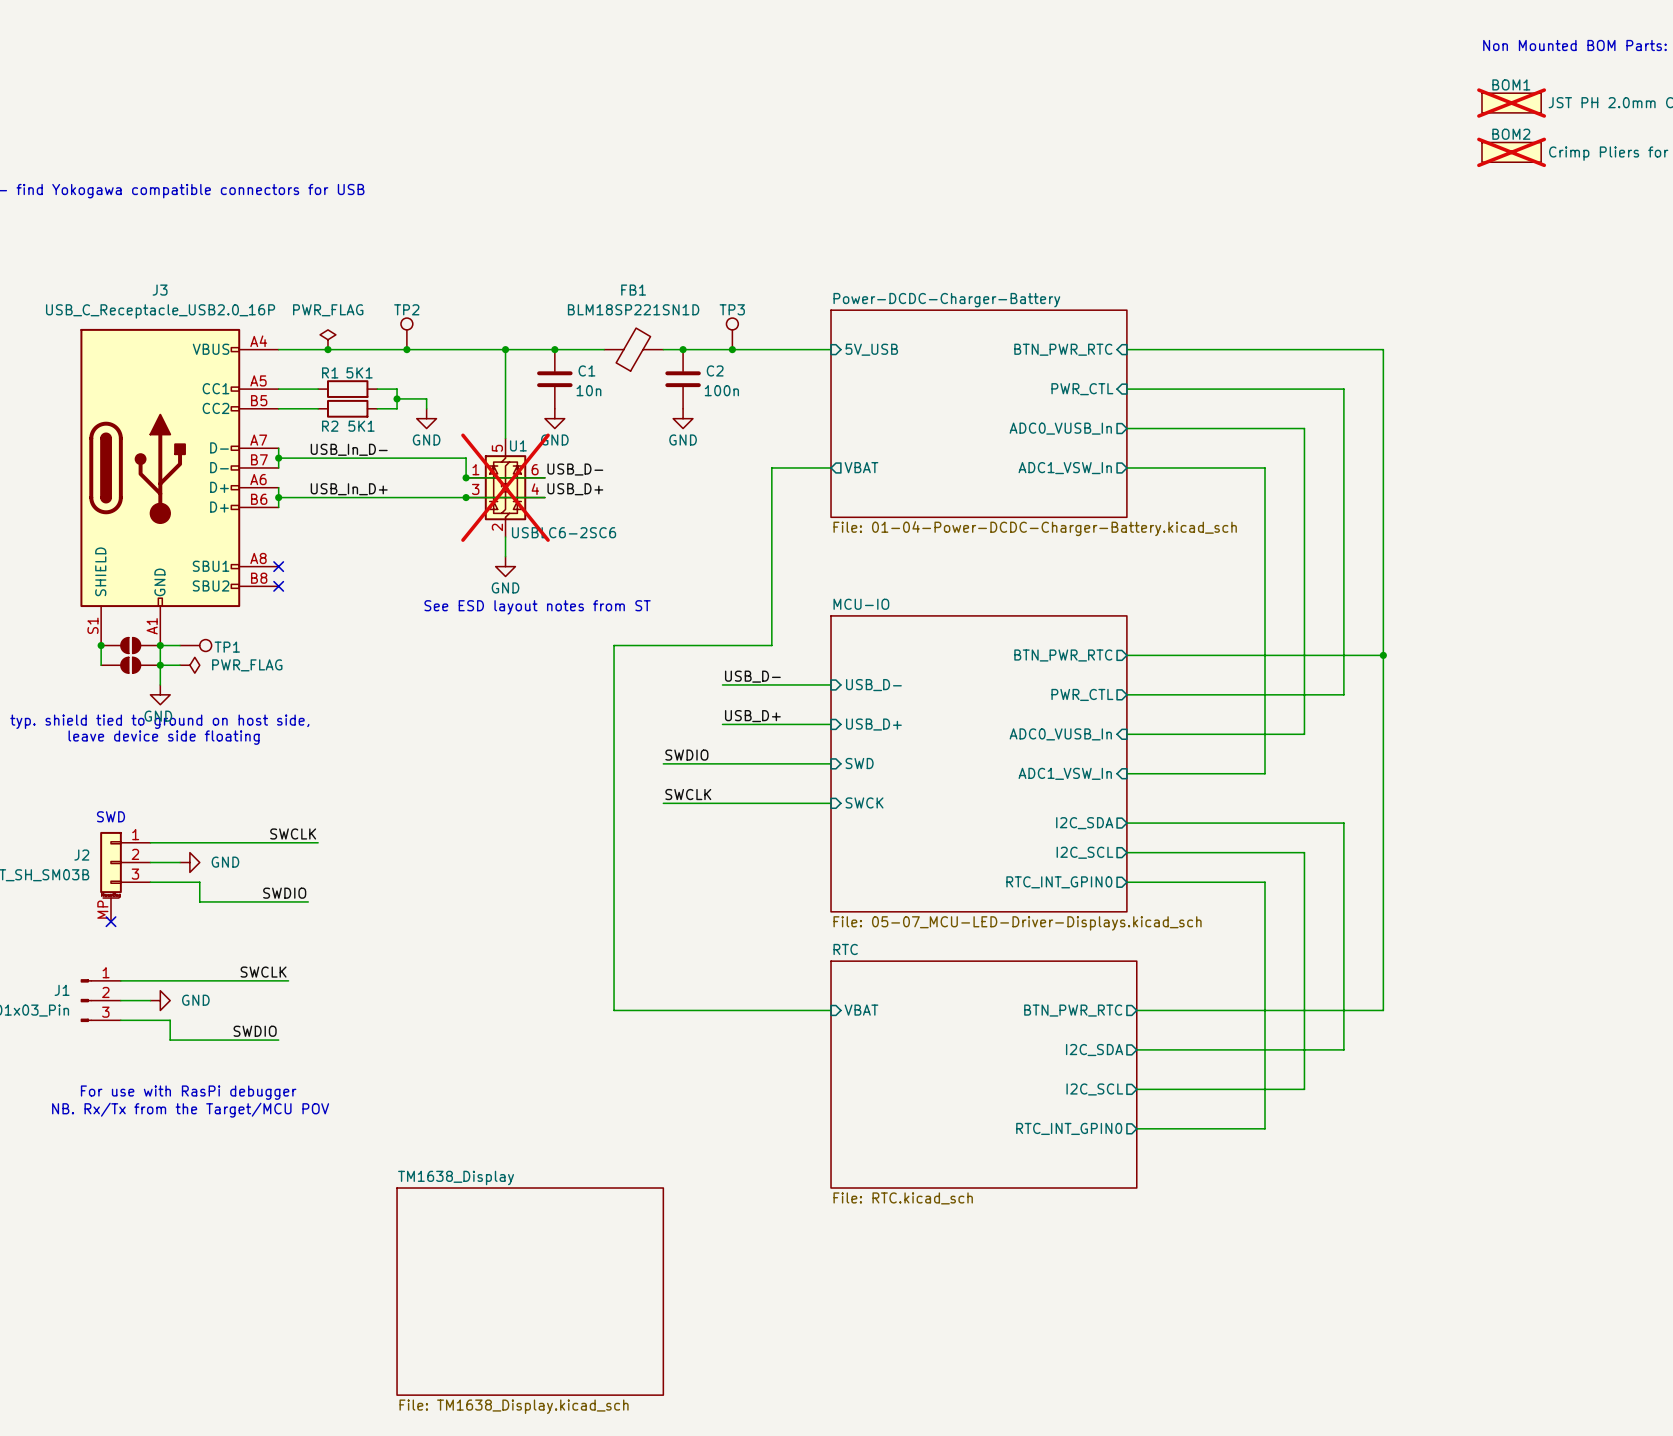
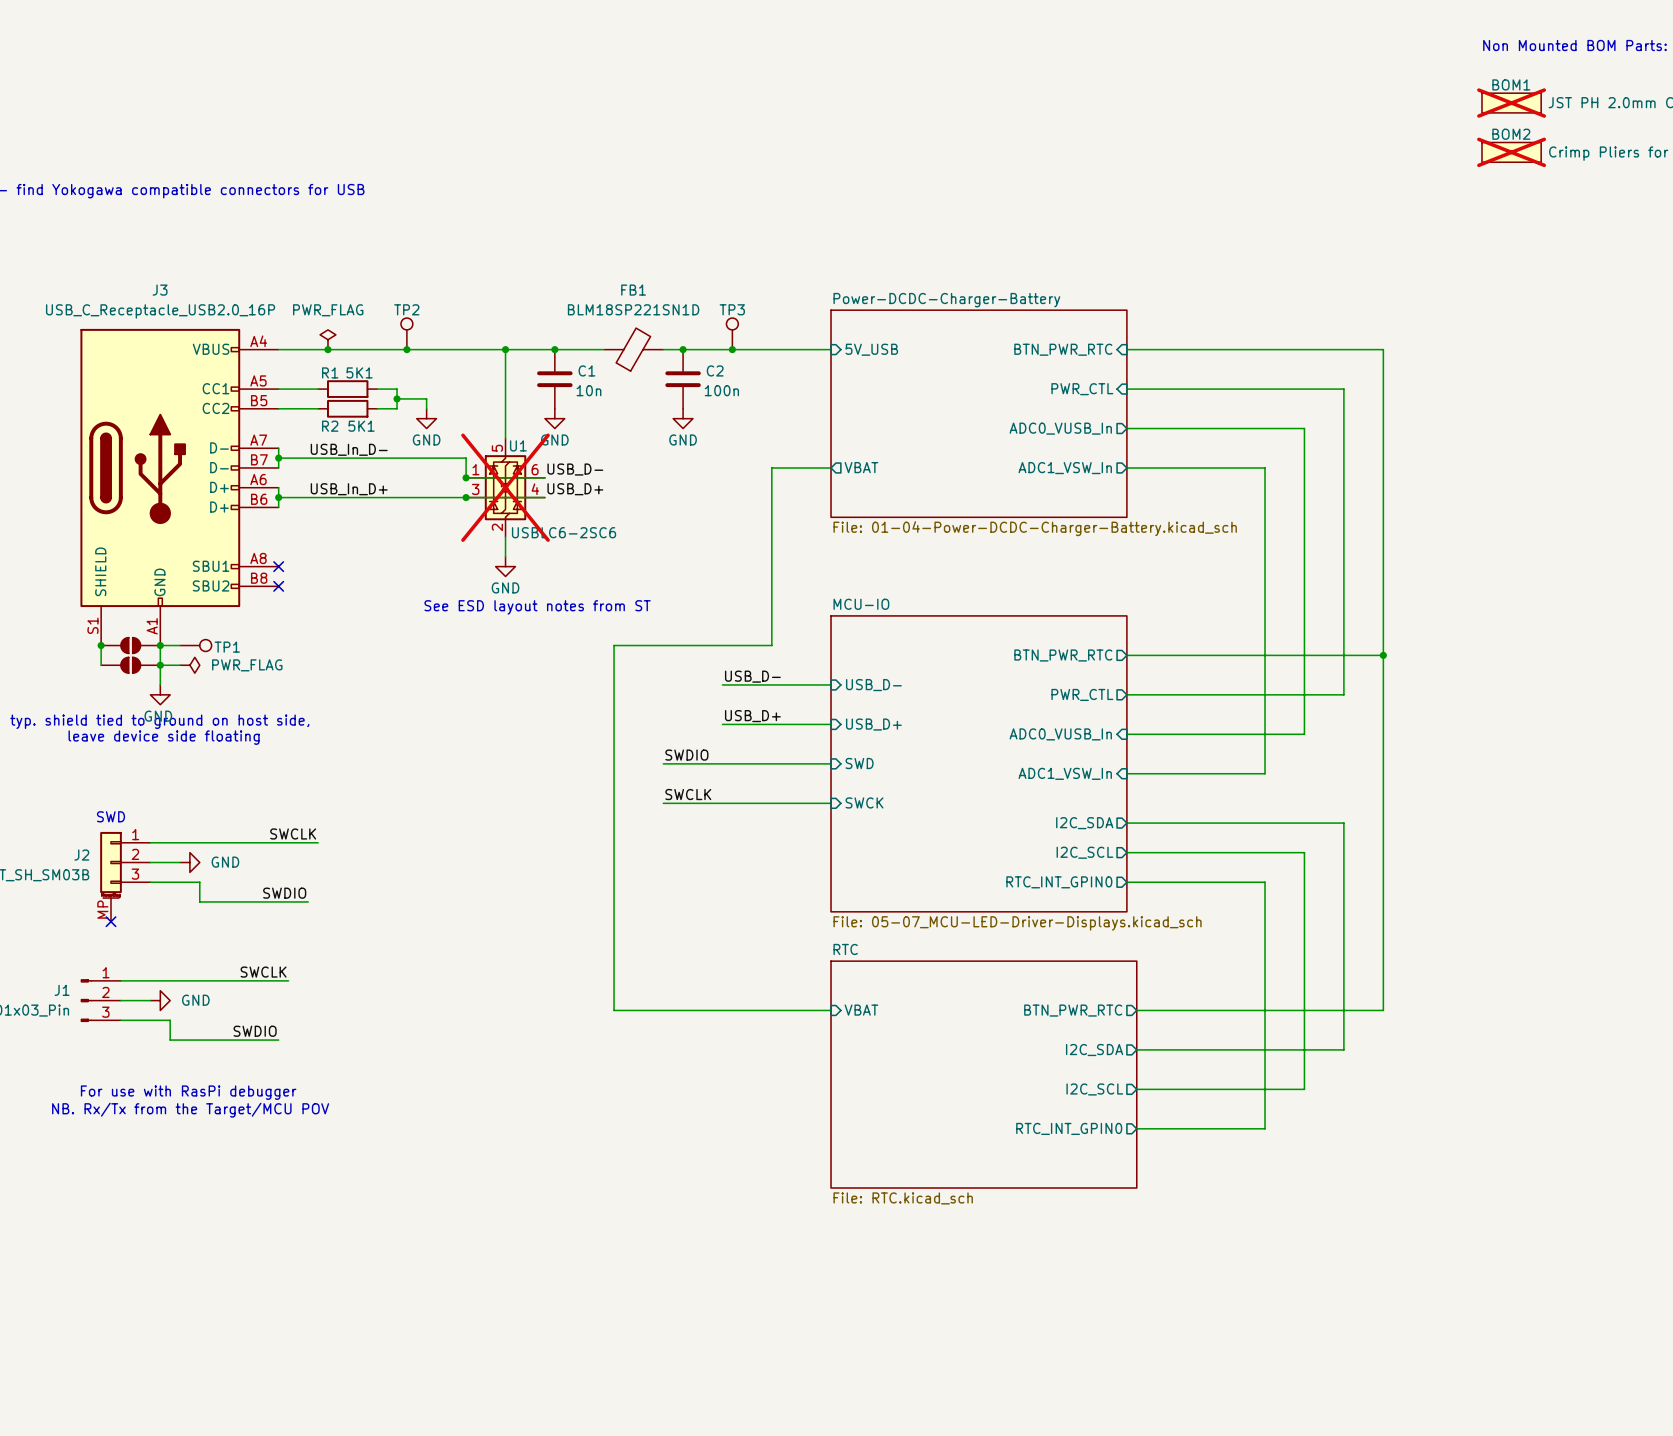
sheet TM1638_Display: File: TM1638_Display.kicad_sch (530, 1291) -> none

